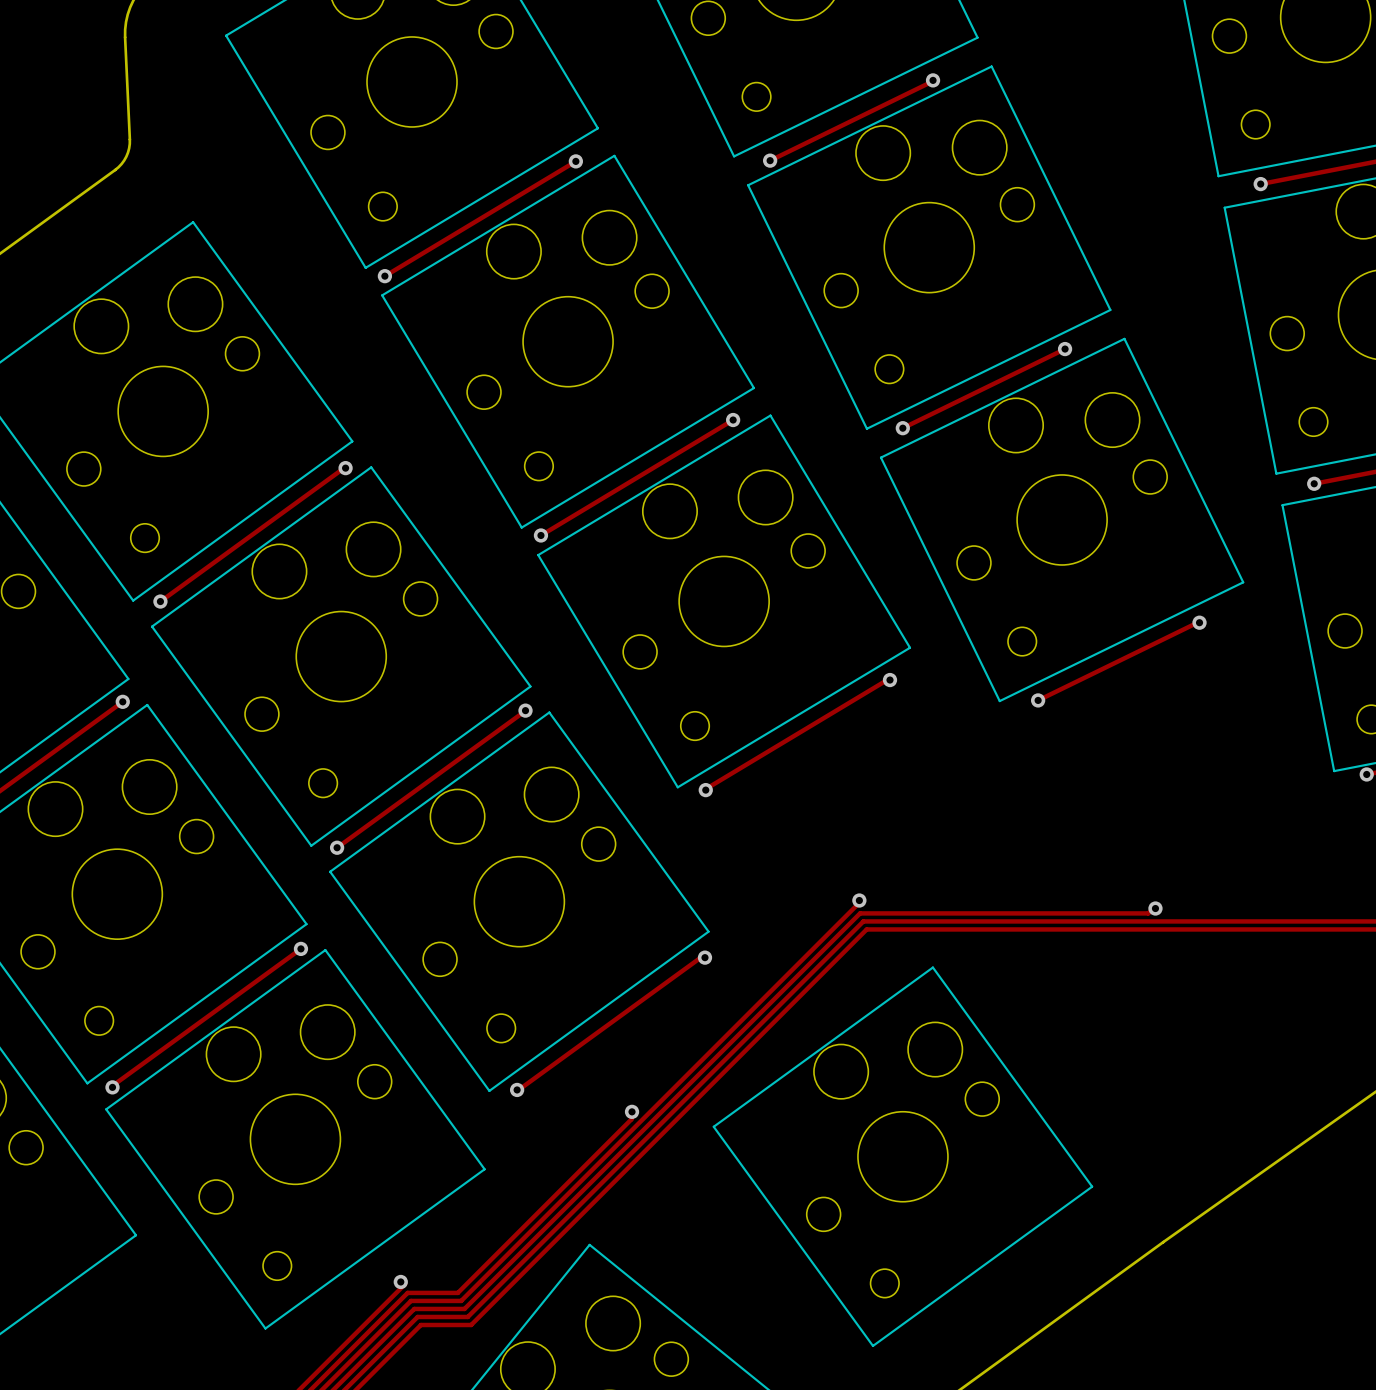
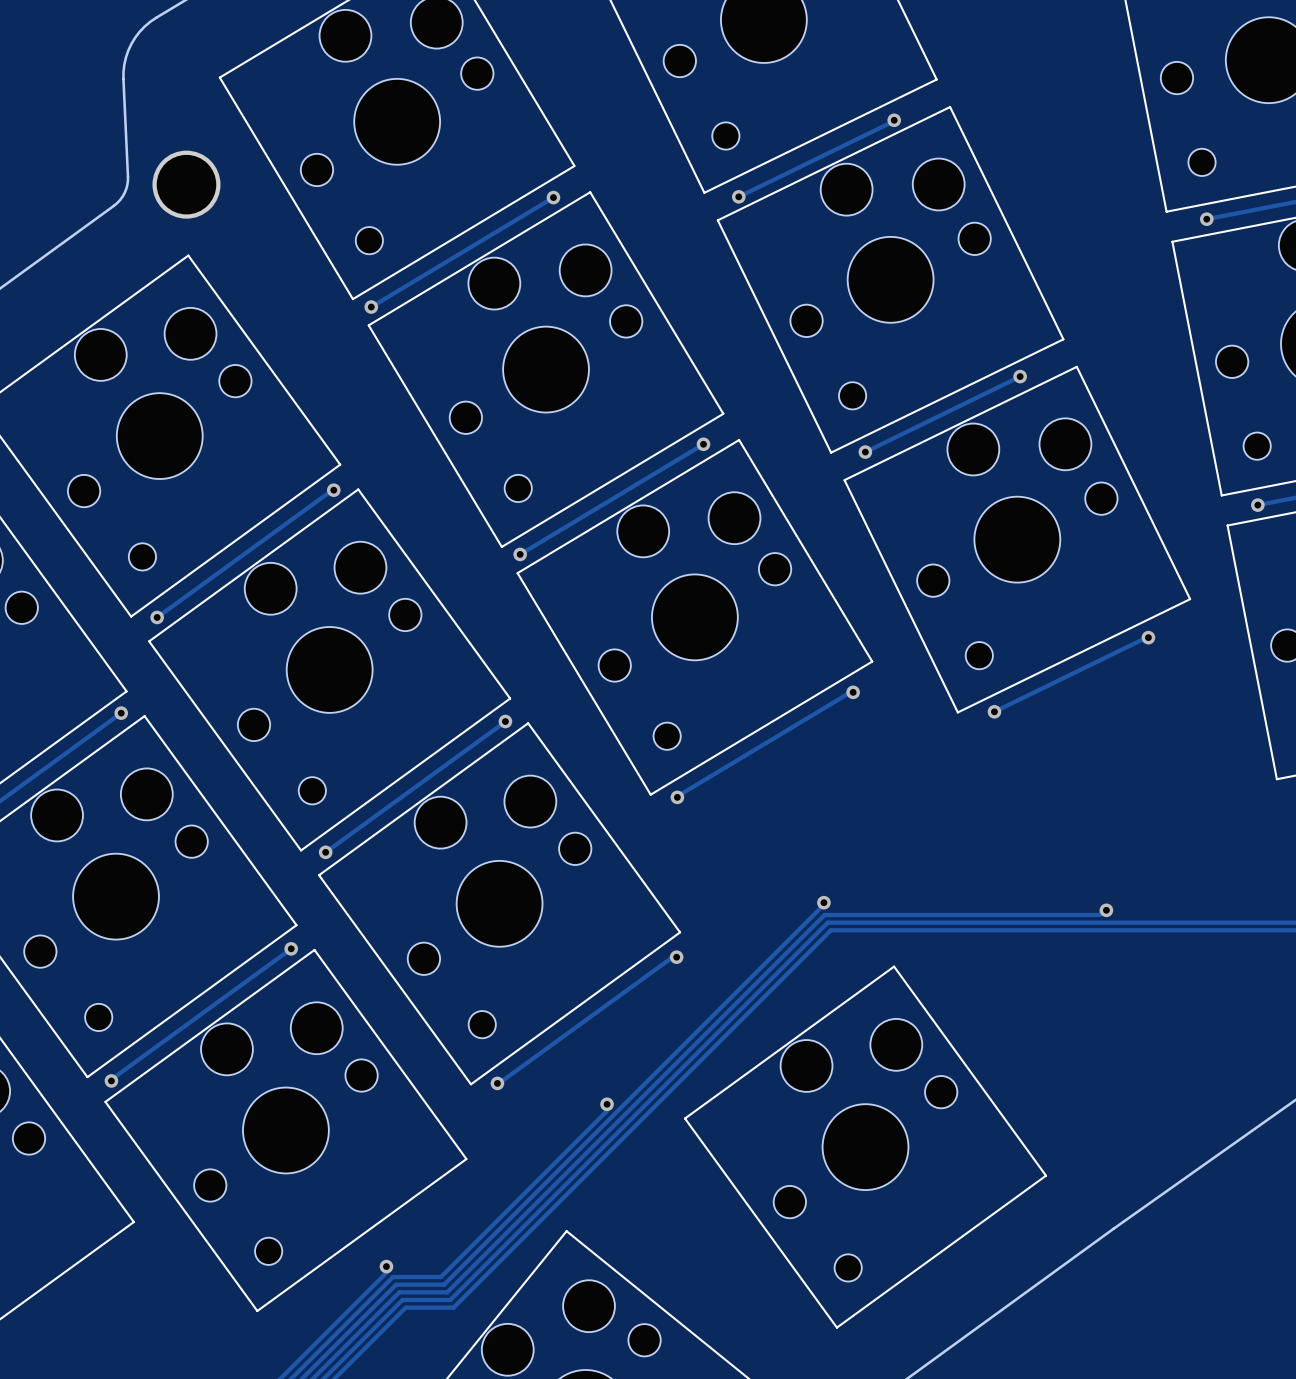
part: none -> (186, 184)

